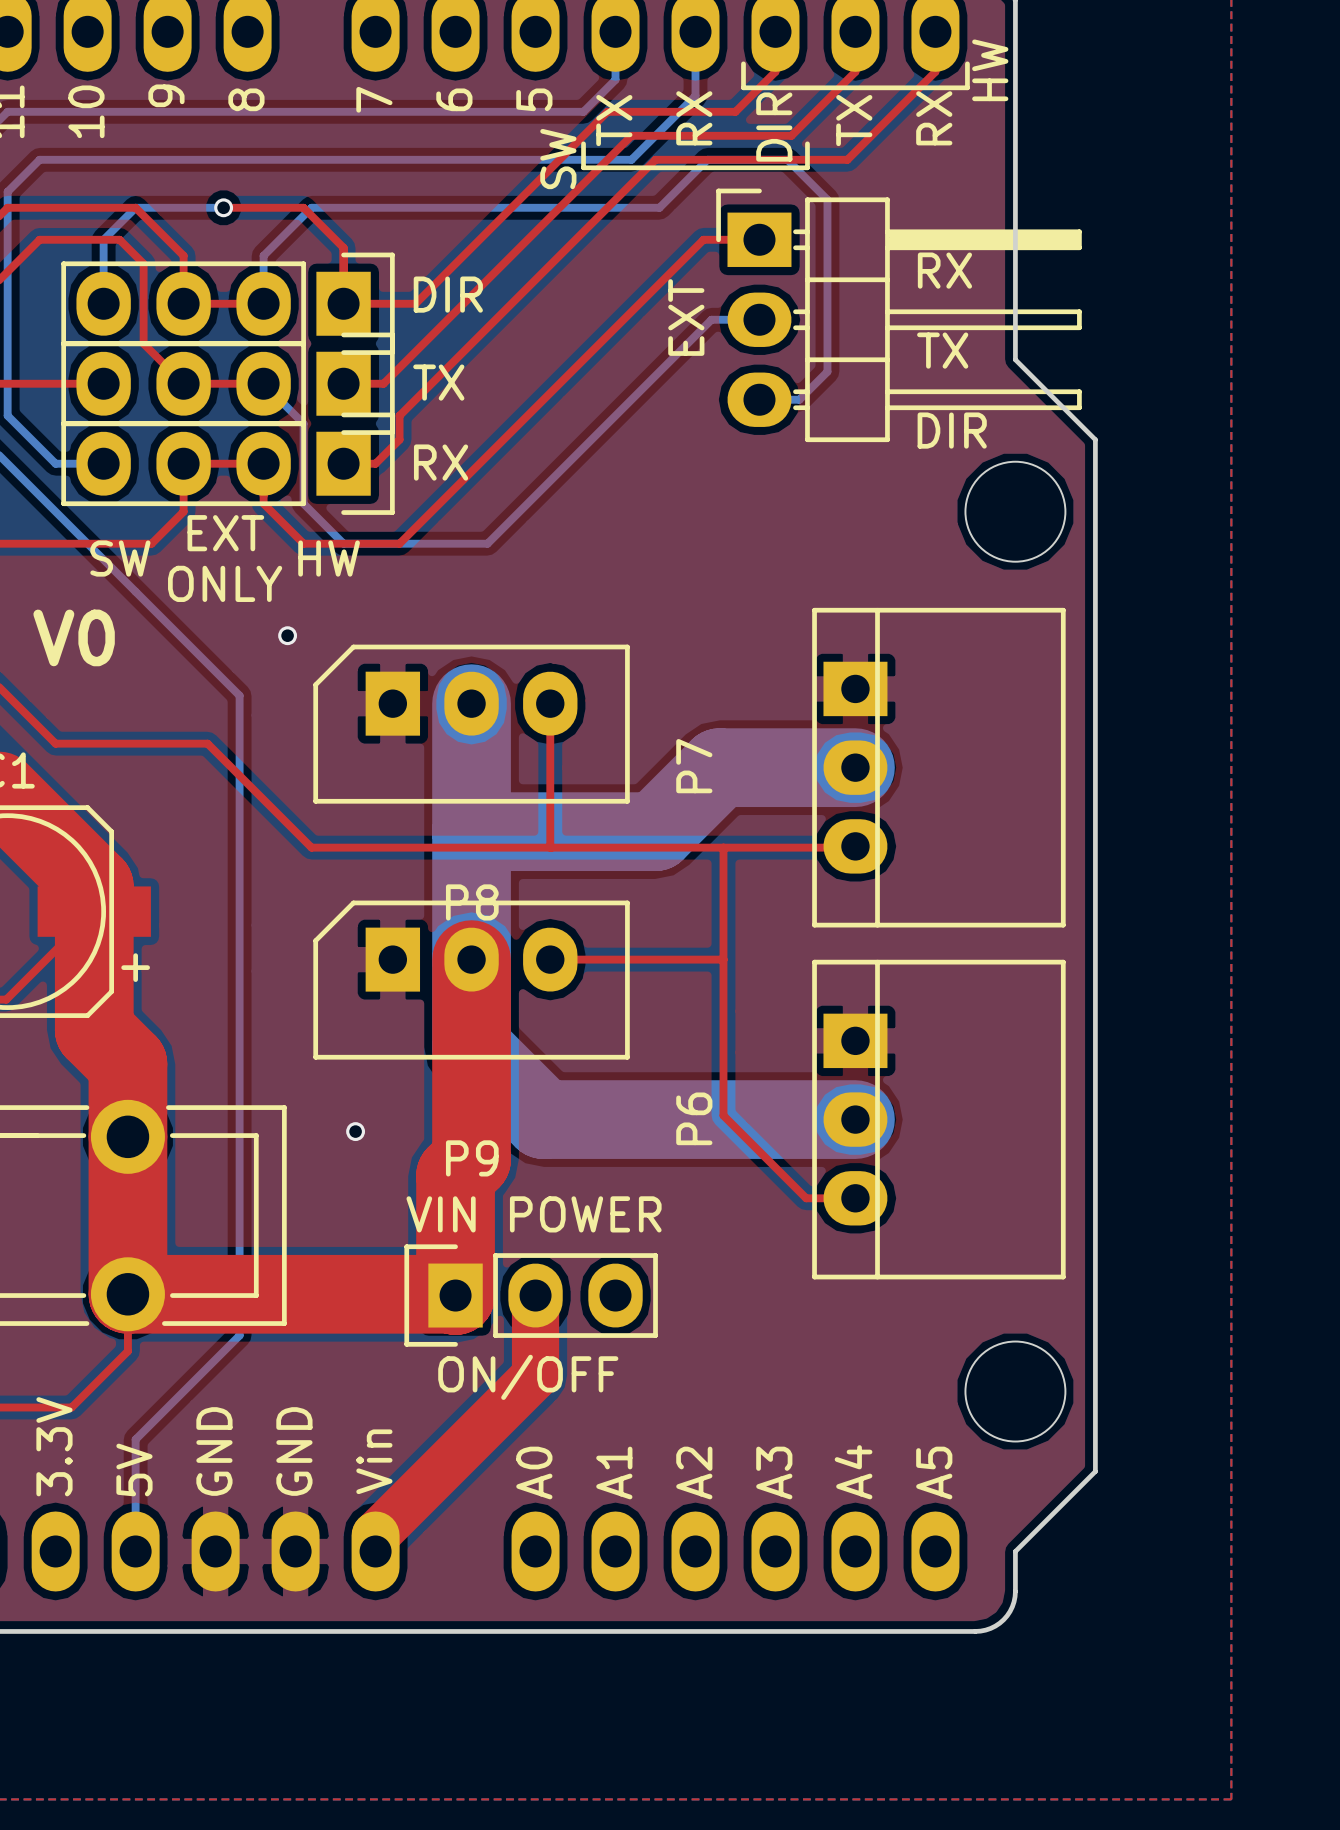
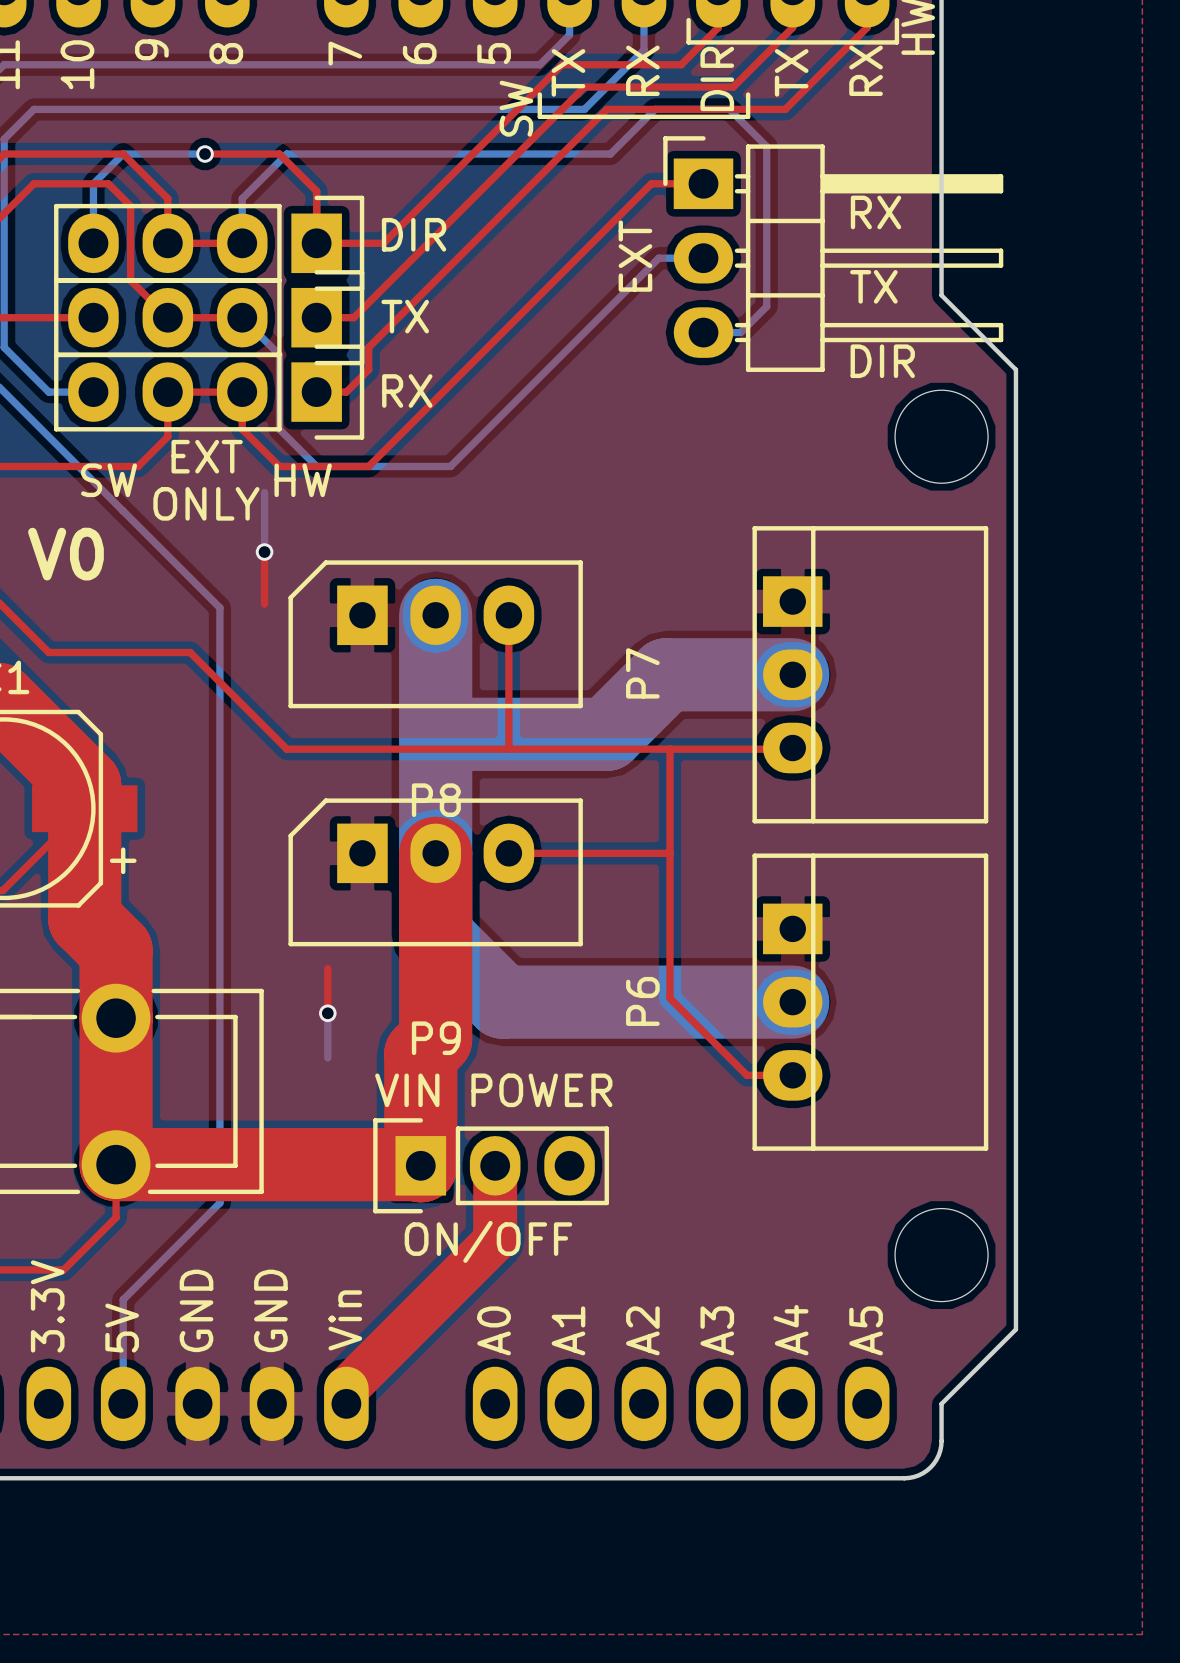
bottom track: none -> (264, 492) (264, 552)
top track: none -> (264, 552) (264, 604)
top track: none -> (327, 968) (327, 1013)
bottom track: none -> (327, 1013) (327, 1057)

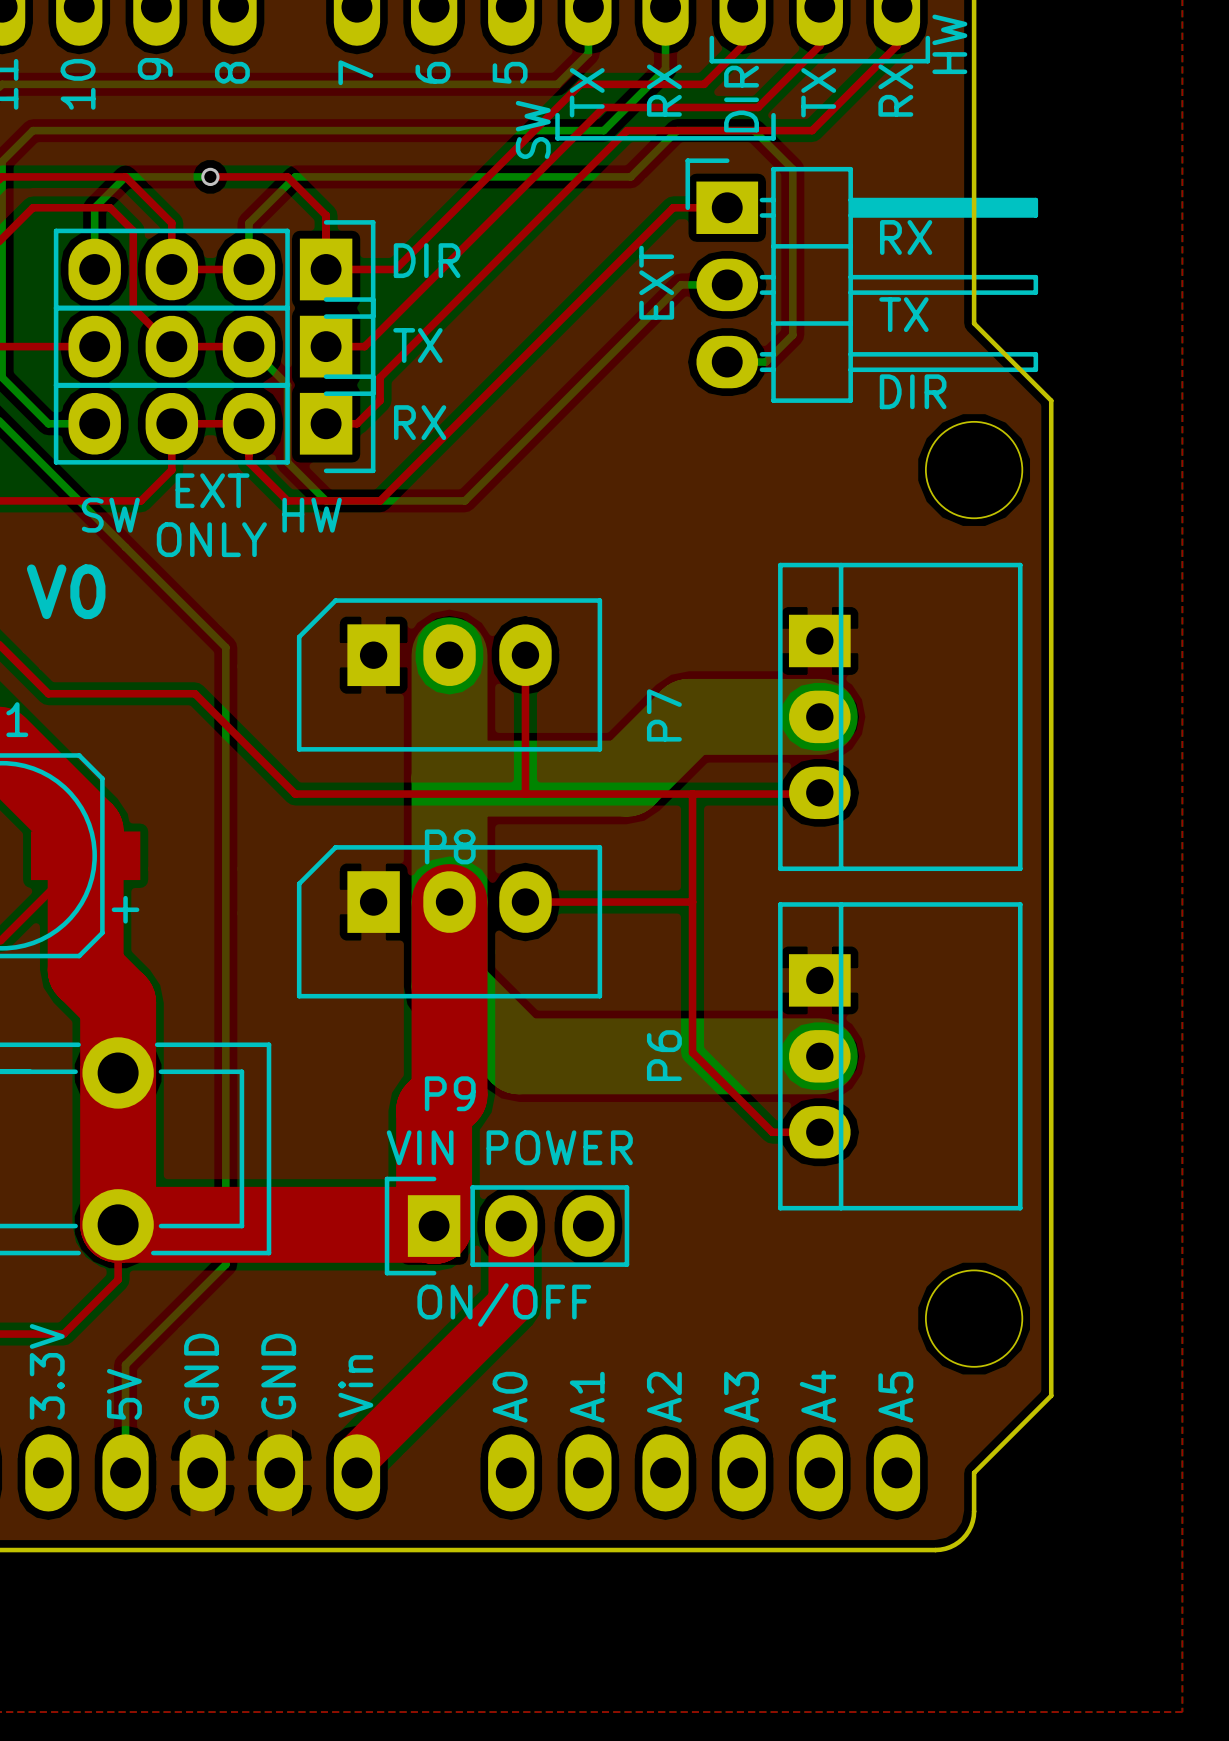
bottom track: (264, 492) (264, 552) -> none
top track: (264, 552) (264, 604) -> none
via: (264, 552) -> none
top track: (327, 968) (327, 1013) -> none
bottom track: (327, 1013) (327, 1057) -> none
via: (327, 1013) -> none

